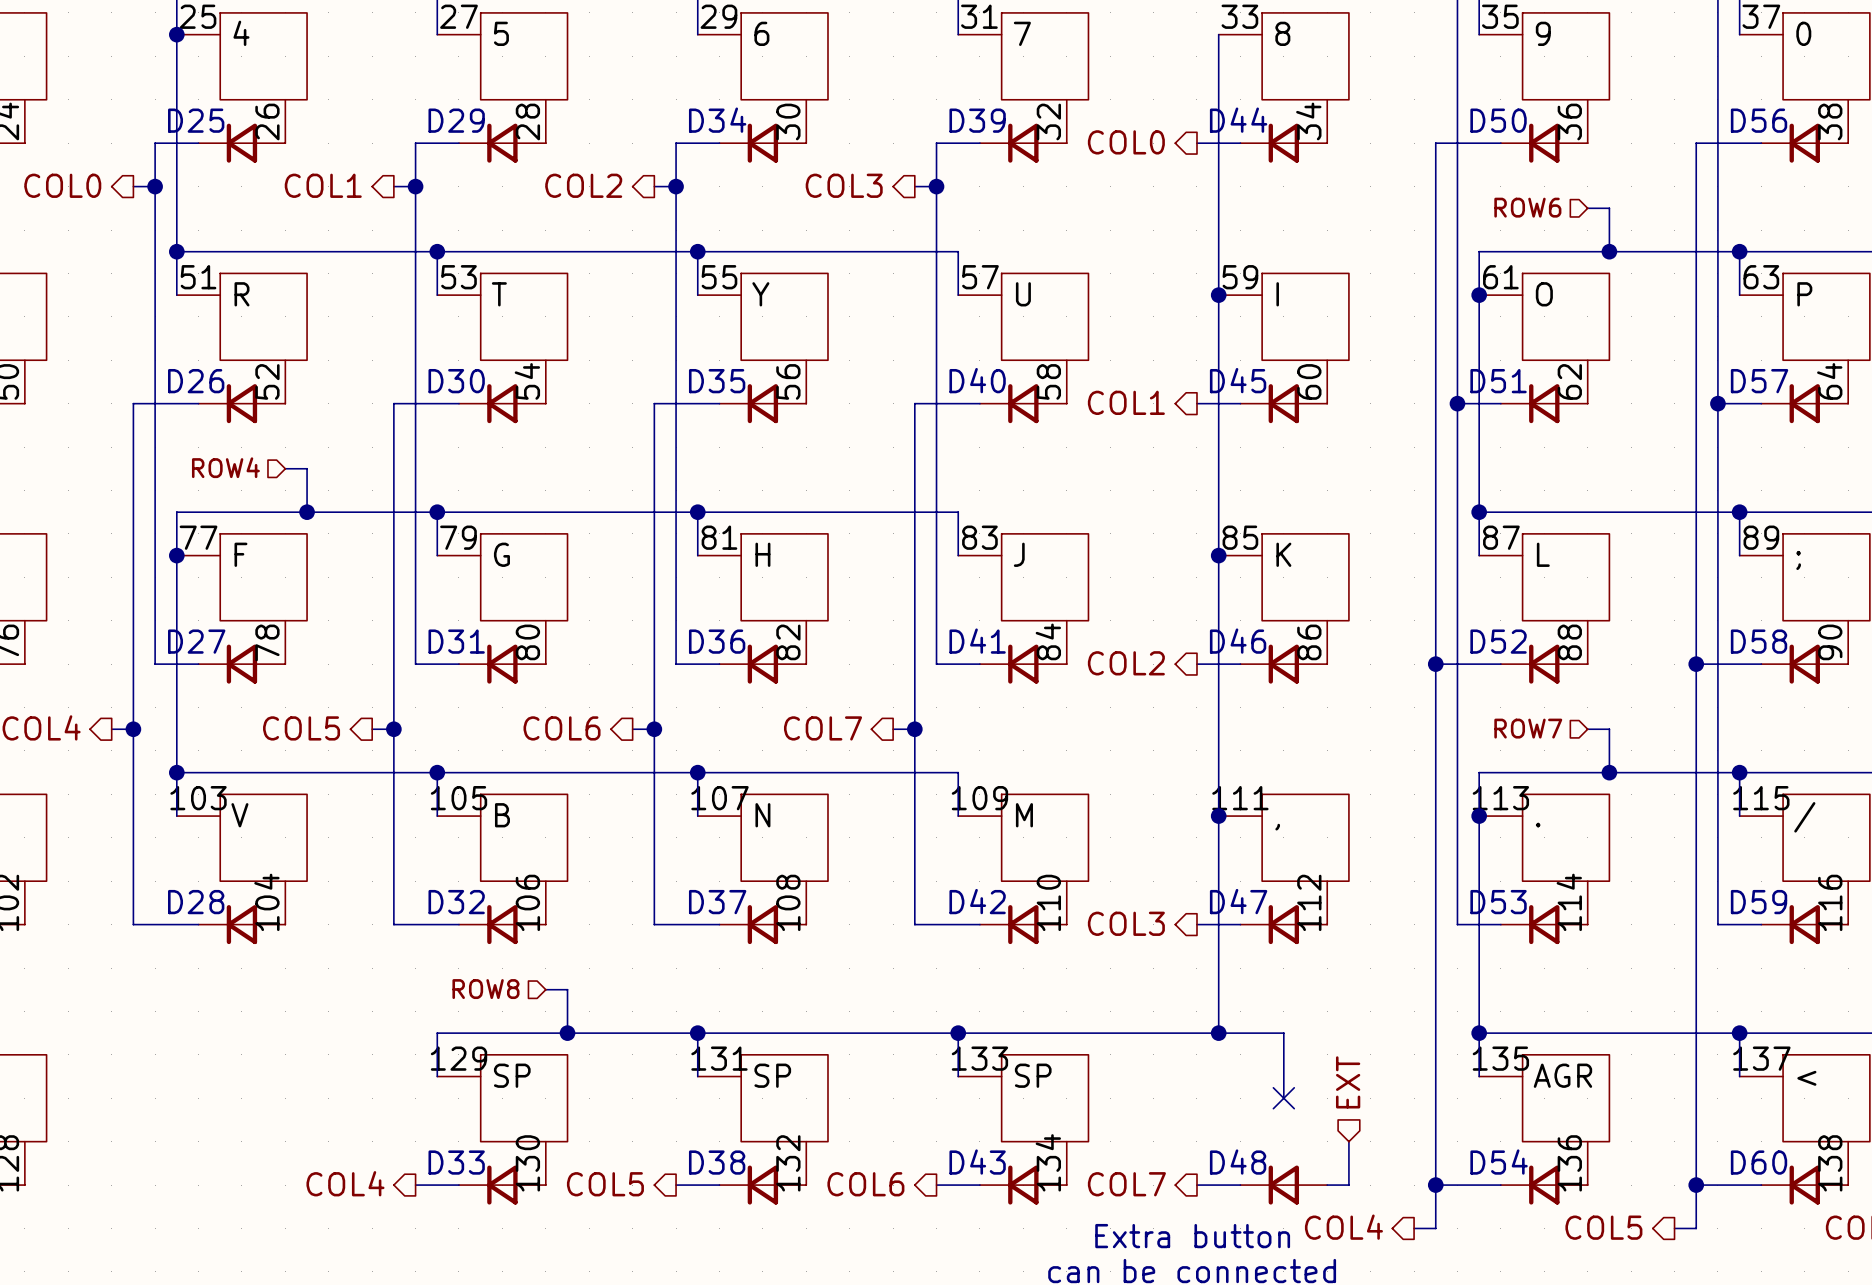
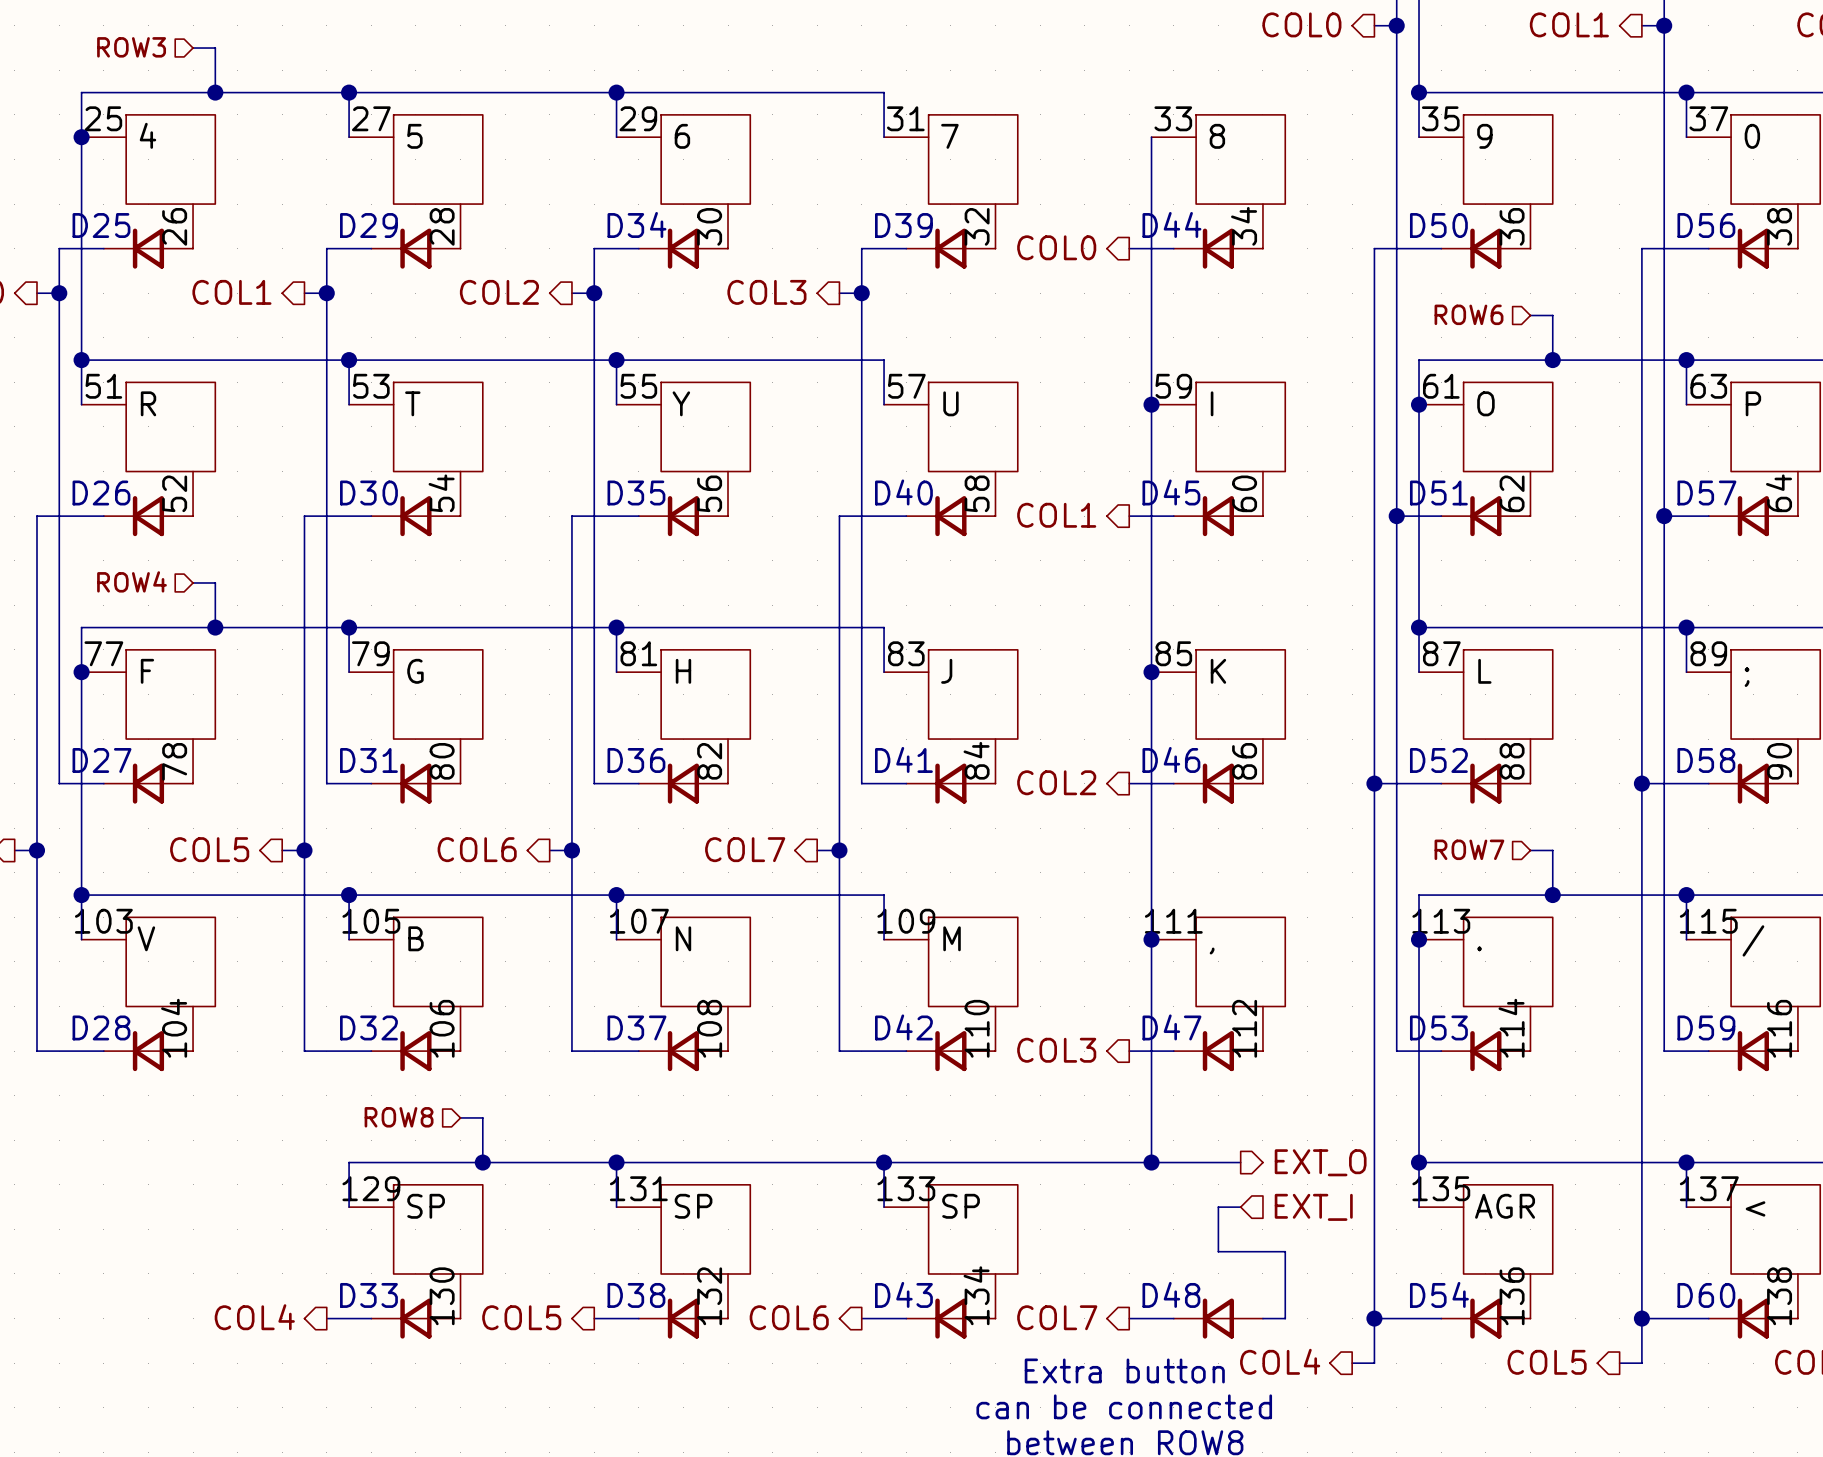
wire: (1283, 1033) (1283, 1076) -> (1218, 1162) (1240, 1162)
hierarchical label: none -> EXT_O (1320, 1162)
wire: none -> (1218, 1207) (1240, 1207)
hierarchical label: EXT (1348, 1082) -> EXT_I (1313, 1207)
wire: none -> (1218, 1229) (1218, 1251) (1285, 1251) (1285, 1273)
no-connect mark: (1283, 1098) -> none

